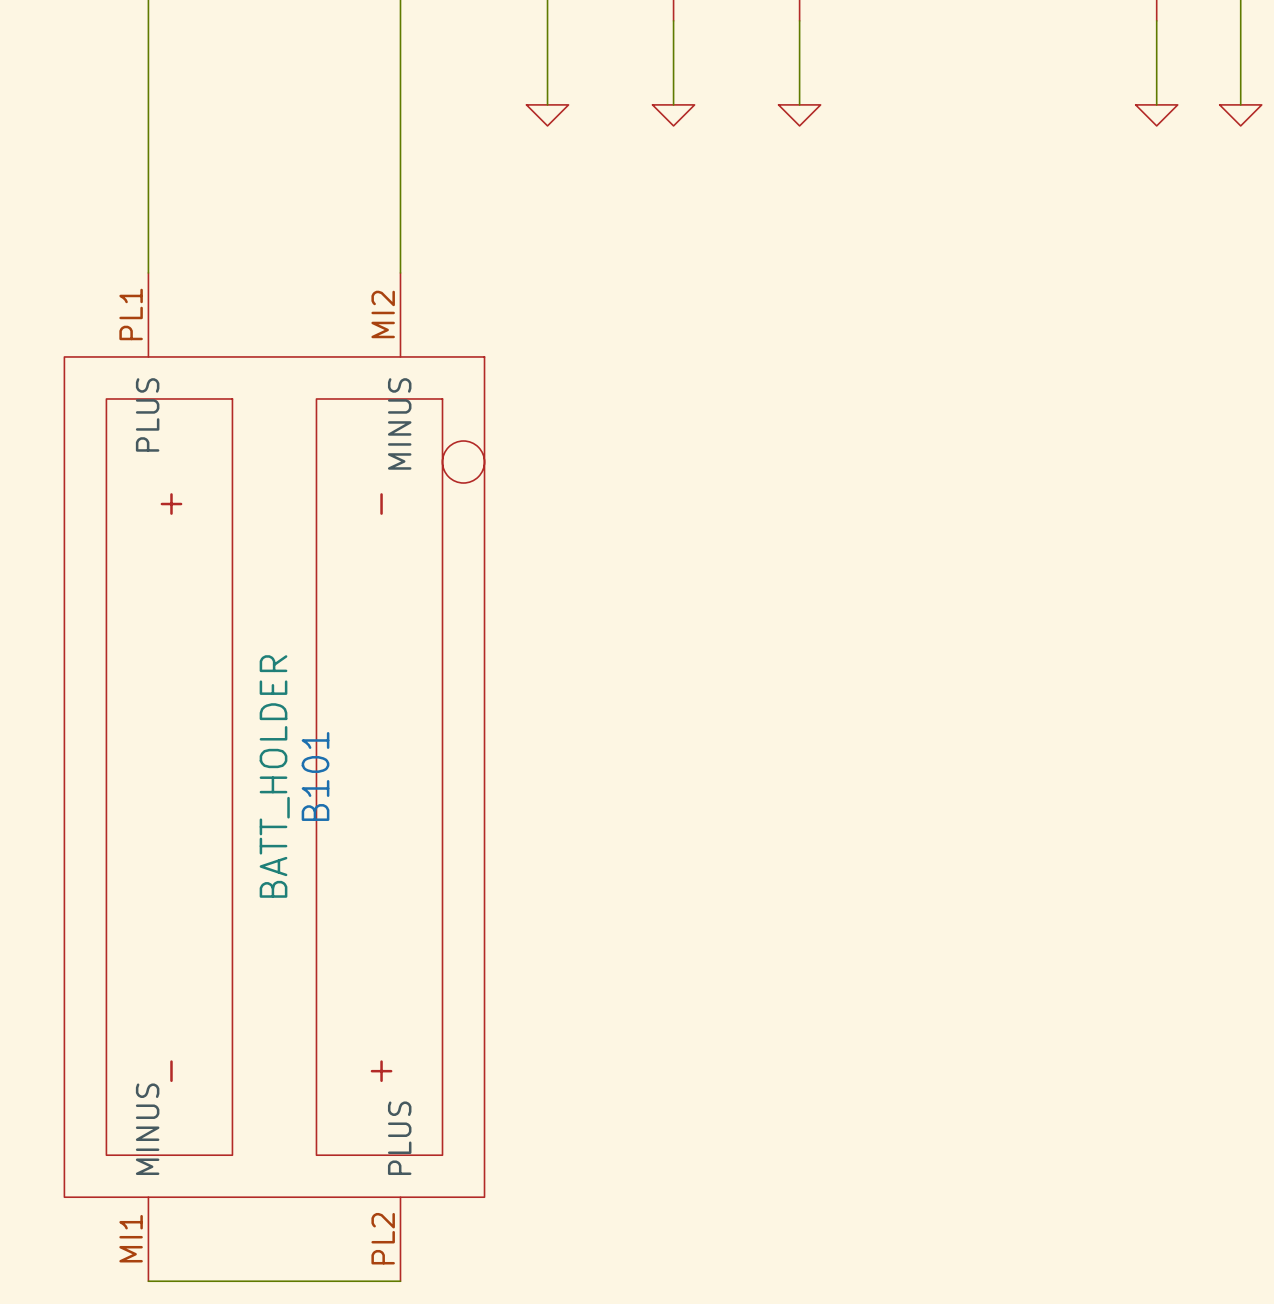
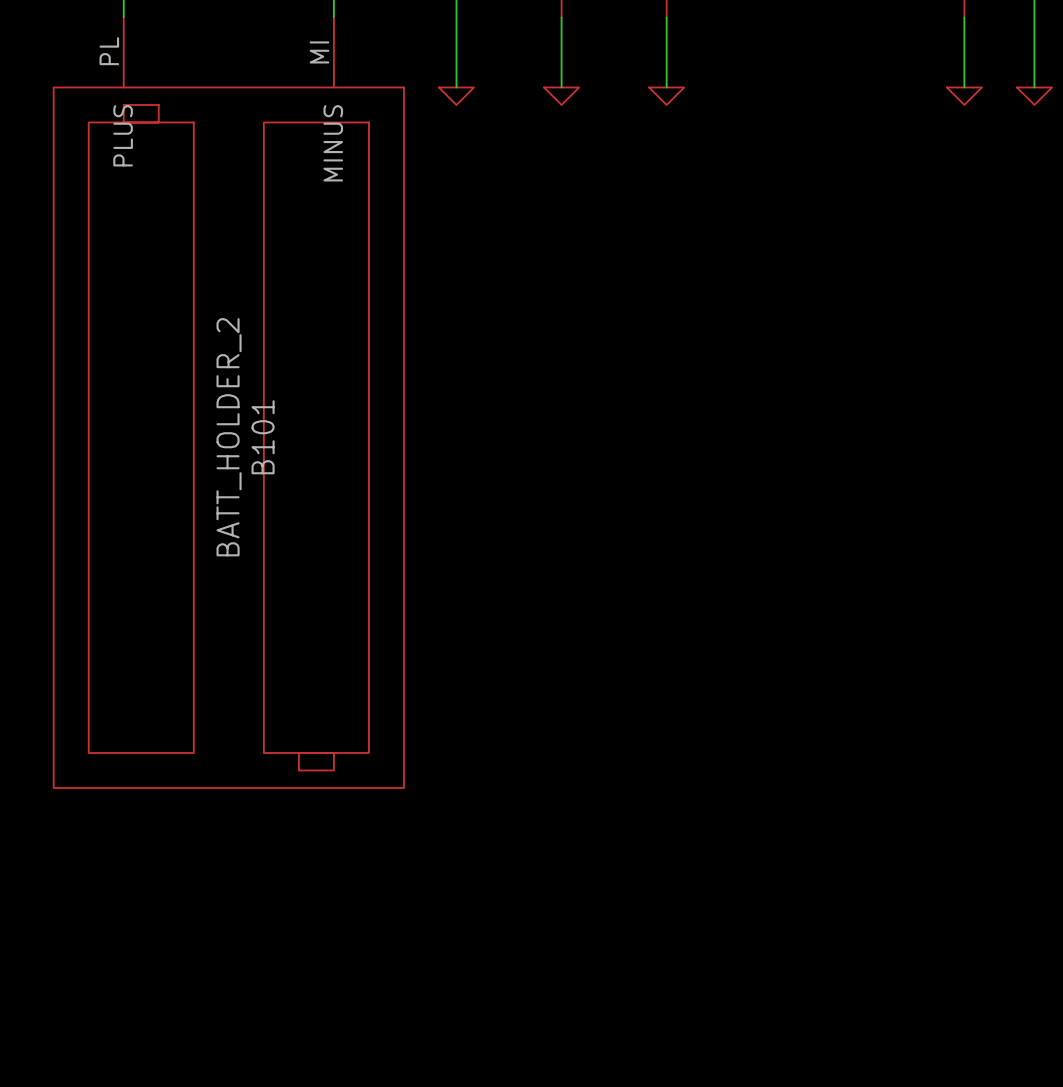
wire: (148, 20) (148, 272) -> none
wire: (400, 20) (400, 272) -> none
B101 symbol: [64, 272, 485, 1282] -> [53, 17, 404, 789]
B101 value: BATT_HOLDER (274, 776) -> BATT_HOLDER_2 (229, 437)
B101 name position: B101 (315, 776) -> B101 (263, 437)
wire: (148, 1281) (400, 1281) -> none

